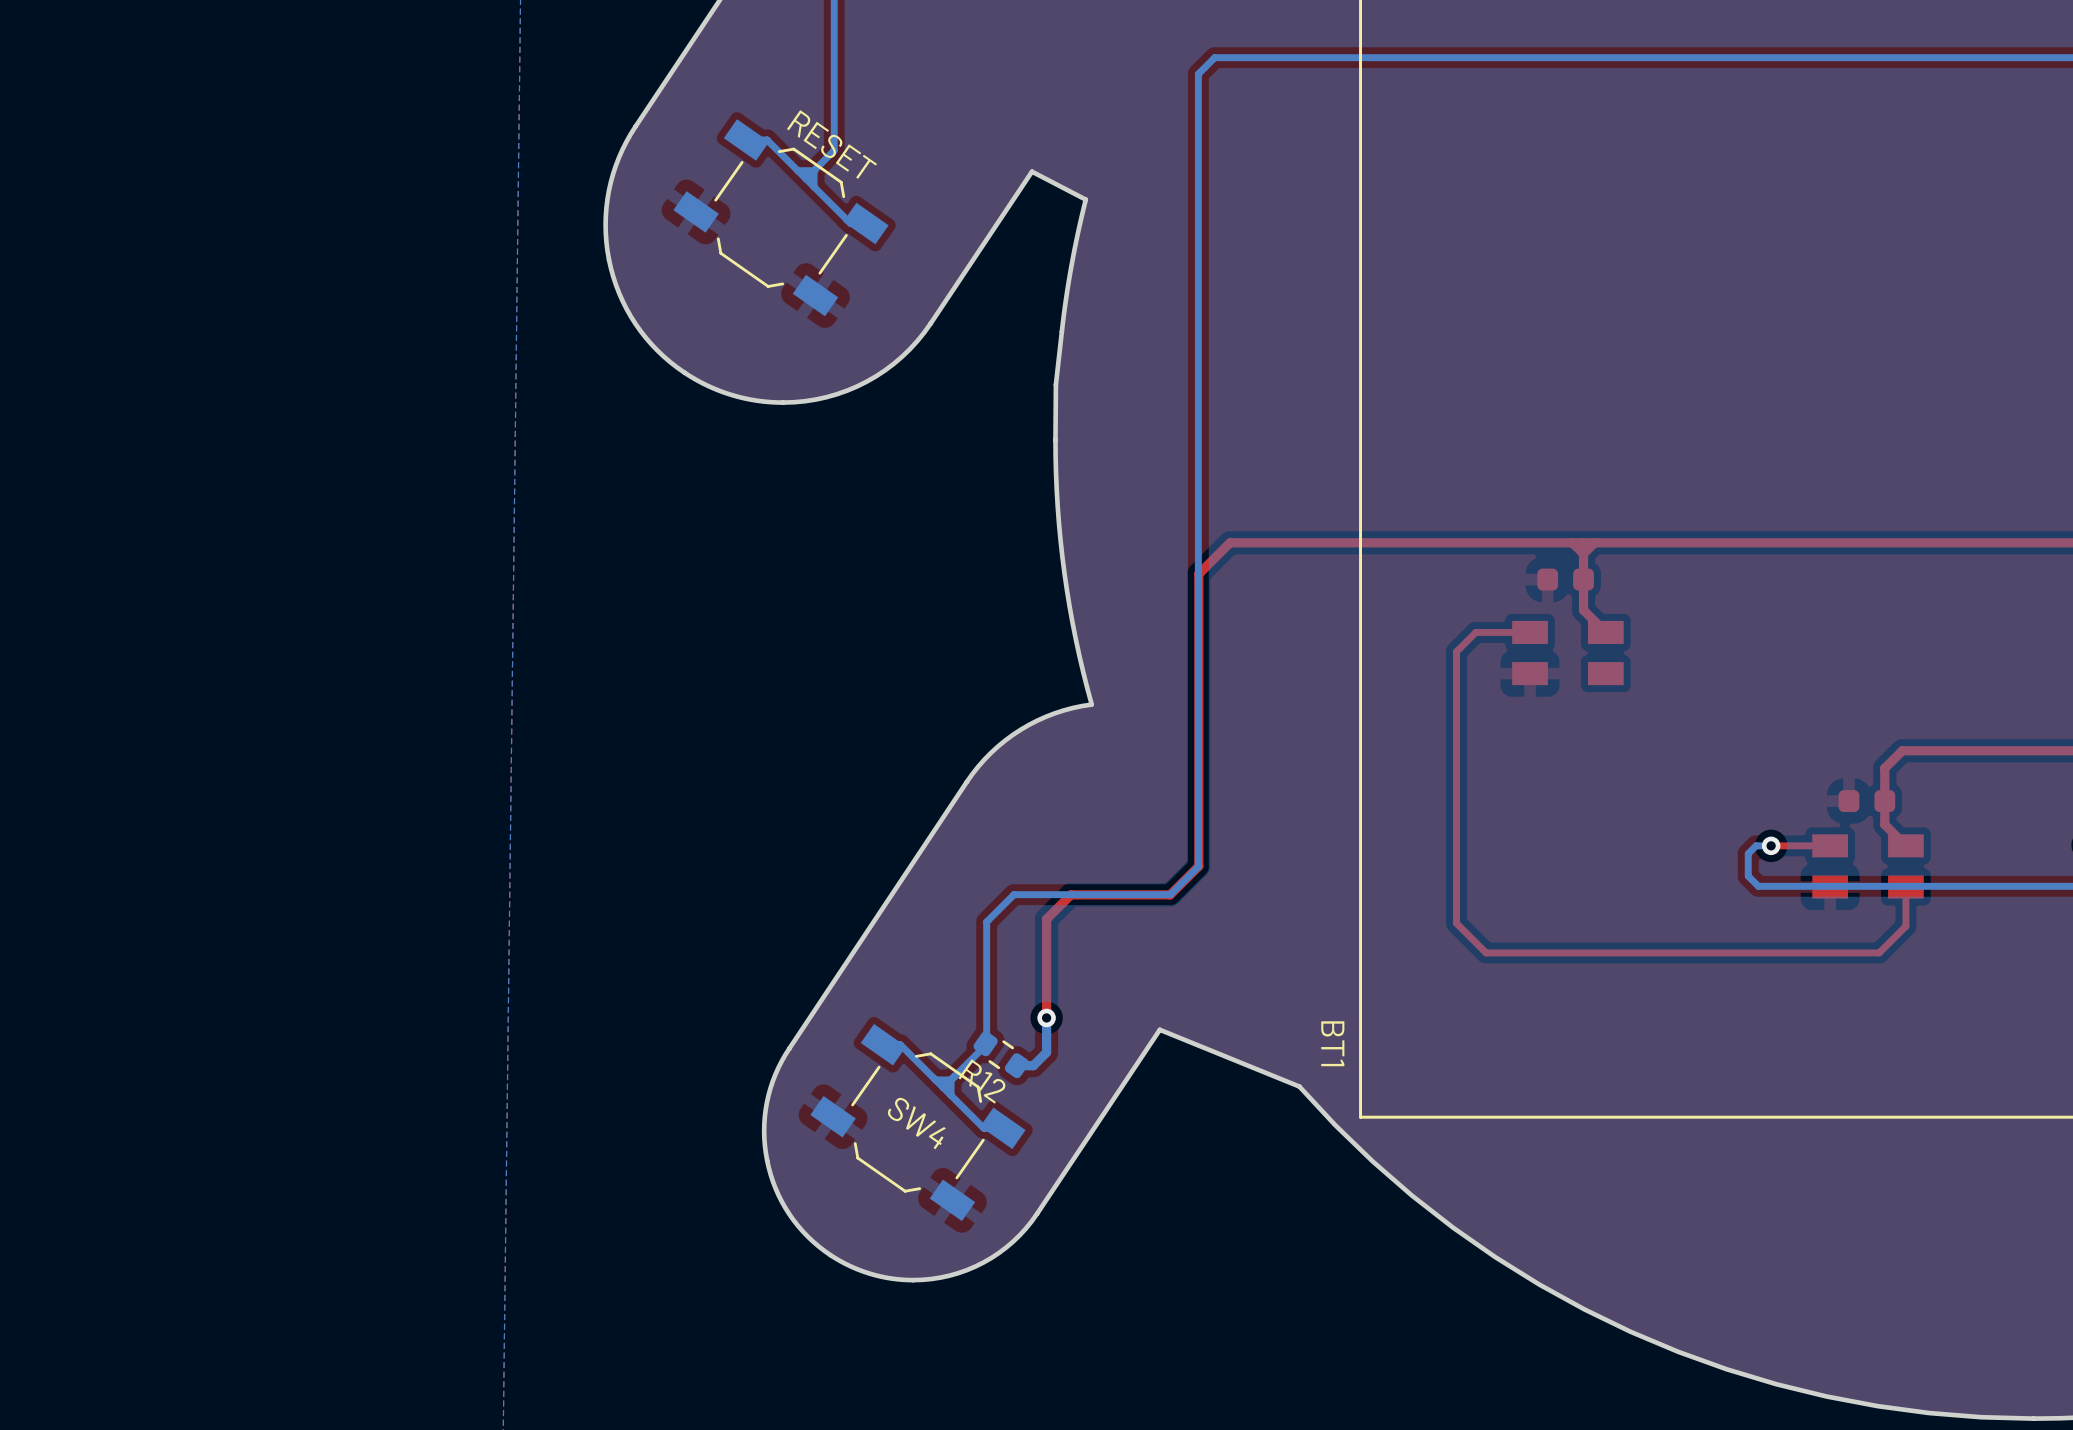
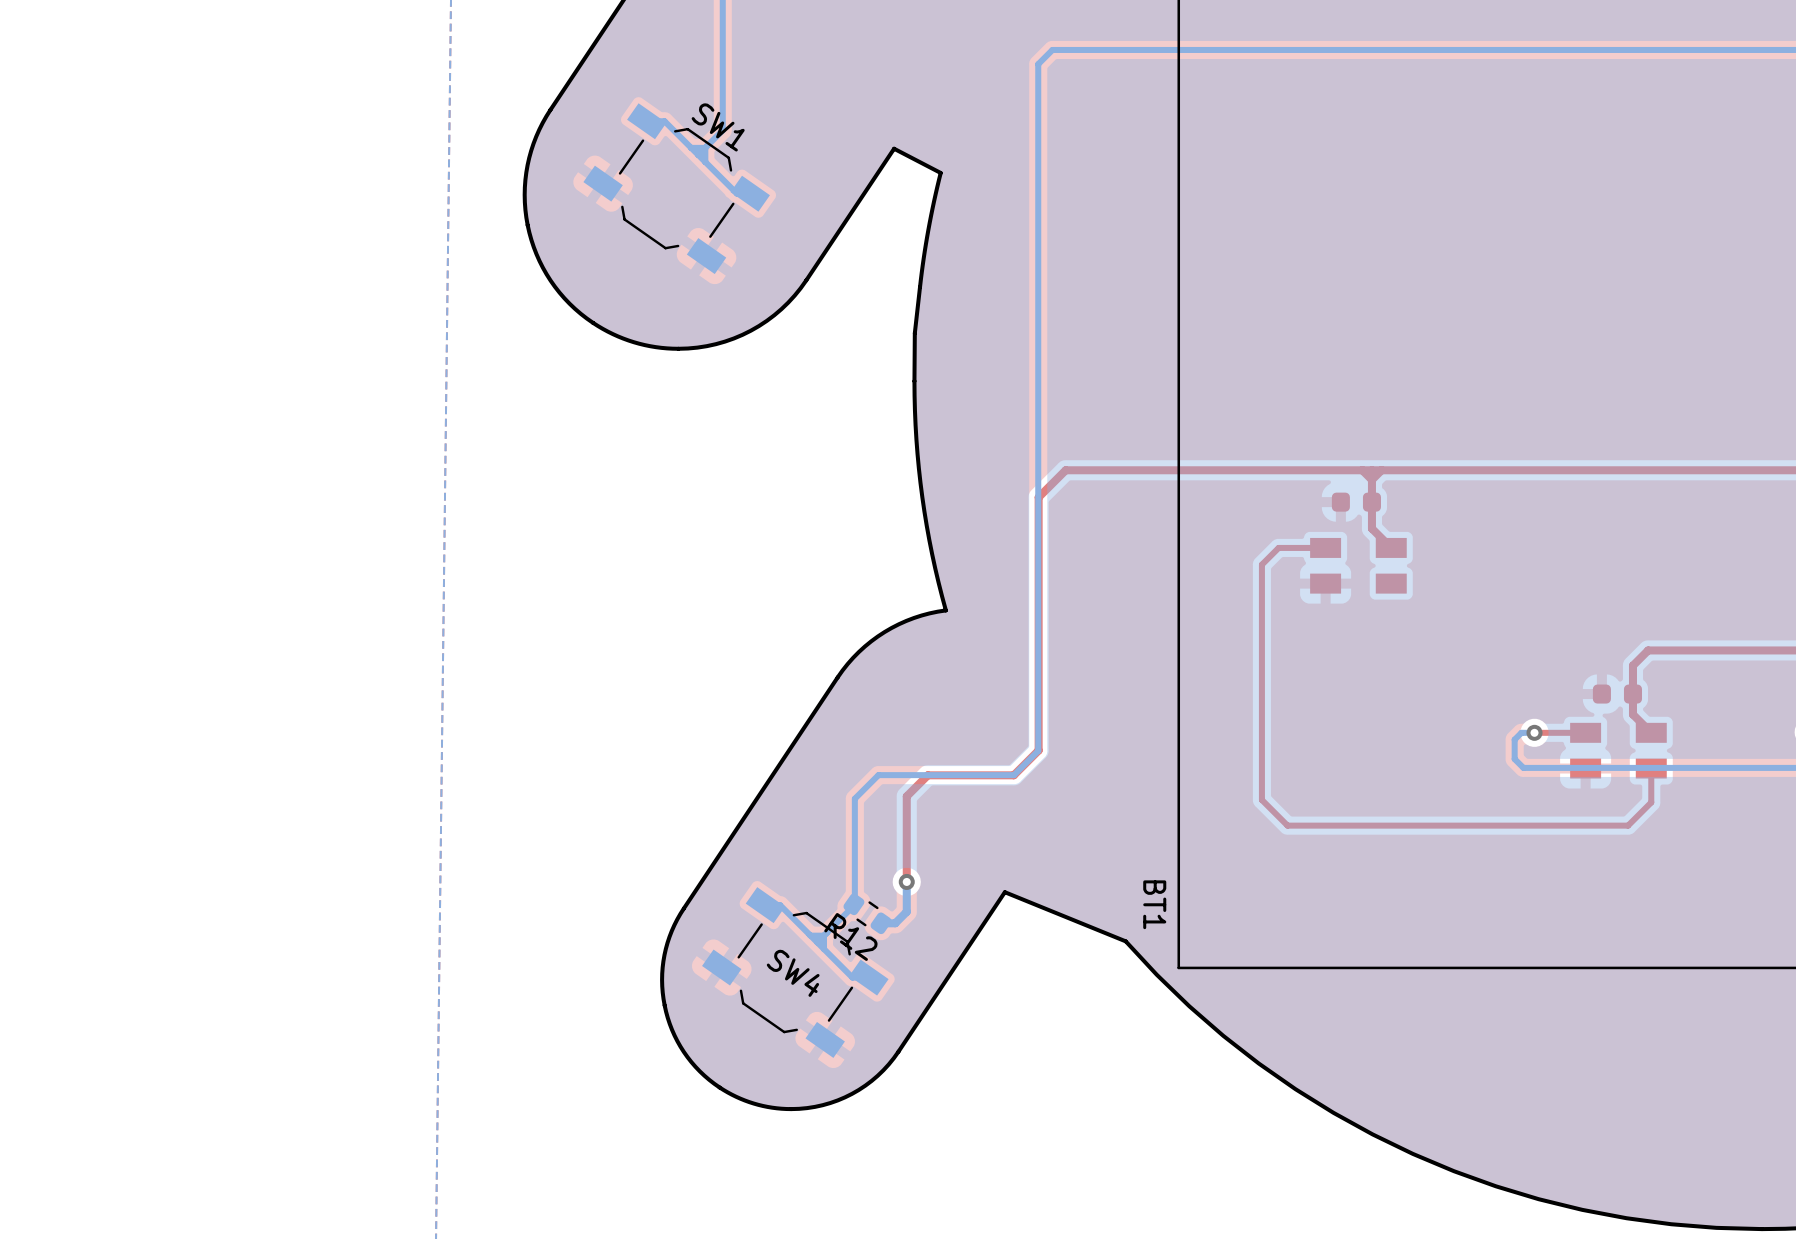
RESET name: RESET (831, 144) -> SW1 (718, 127)

